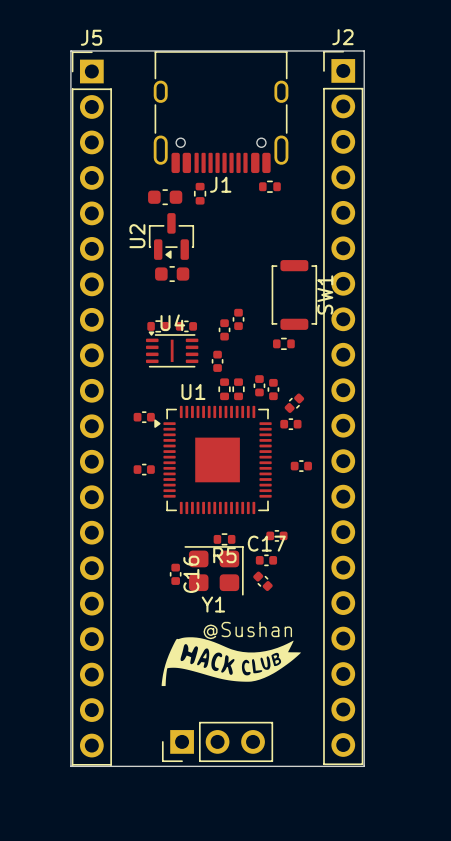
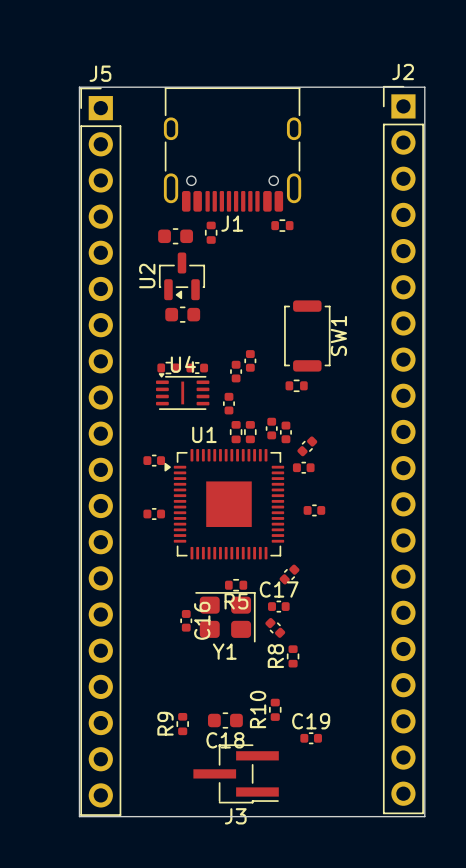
board edge: (364, 50) (364, 766) -> (378, 87) (424, 87) (424, 816) (378, 816)
J2 position: (343, 407) -> (403, 450)
part rotation: 0° (276, 535) -> 45° counterclockwise (289, 574)
R8: none -> (293, 656)
text: @Sushan (247, 630) -> none
drawing: [161, 637, 301, 687] -> none
R10: none -> (275, 709)
C18: none -> (225, 720)
R9: none -> (182, 724)
C19: none -> (311, 738)
J3: none -> (236, 773)
part: (217, 741) -> none

